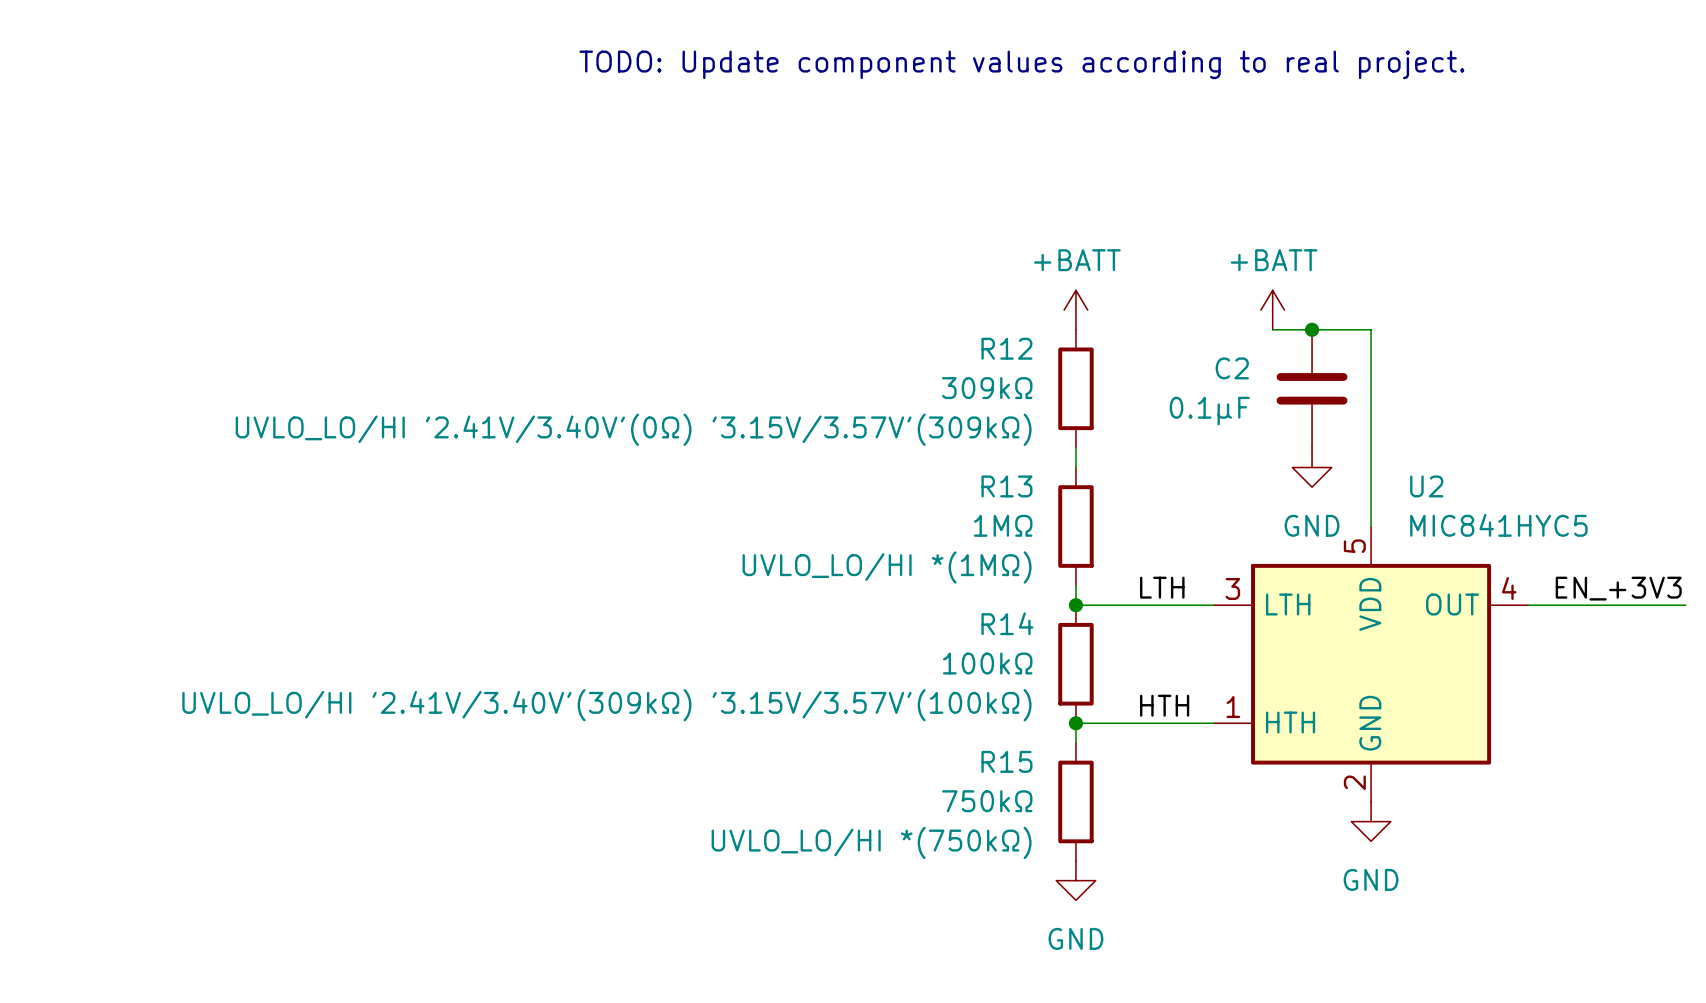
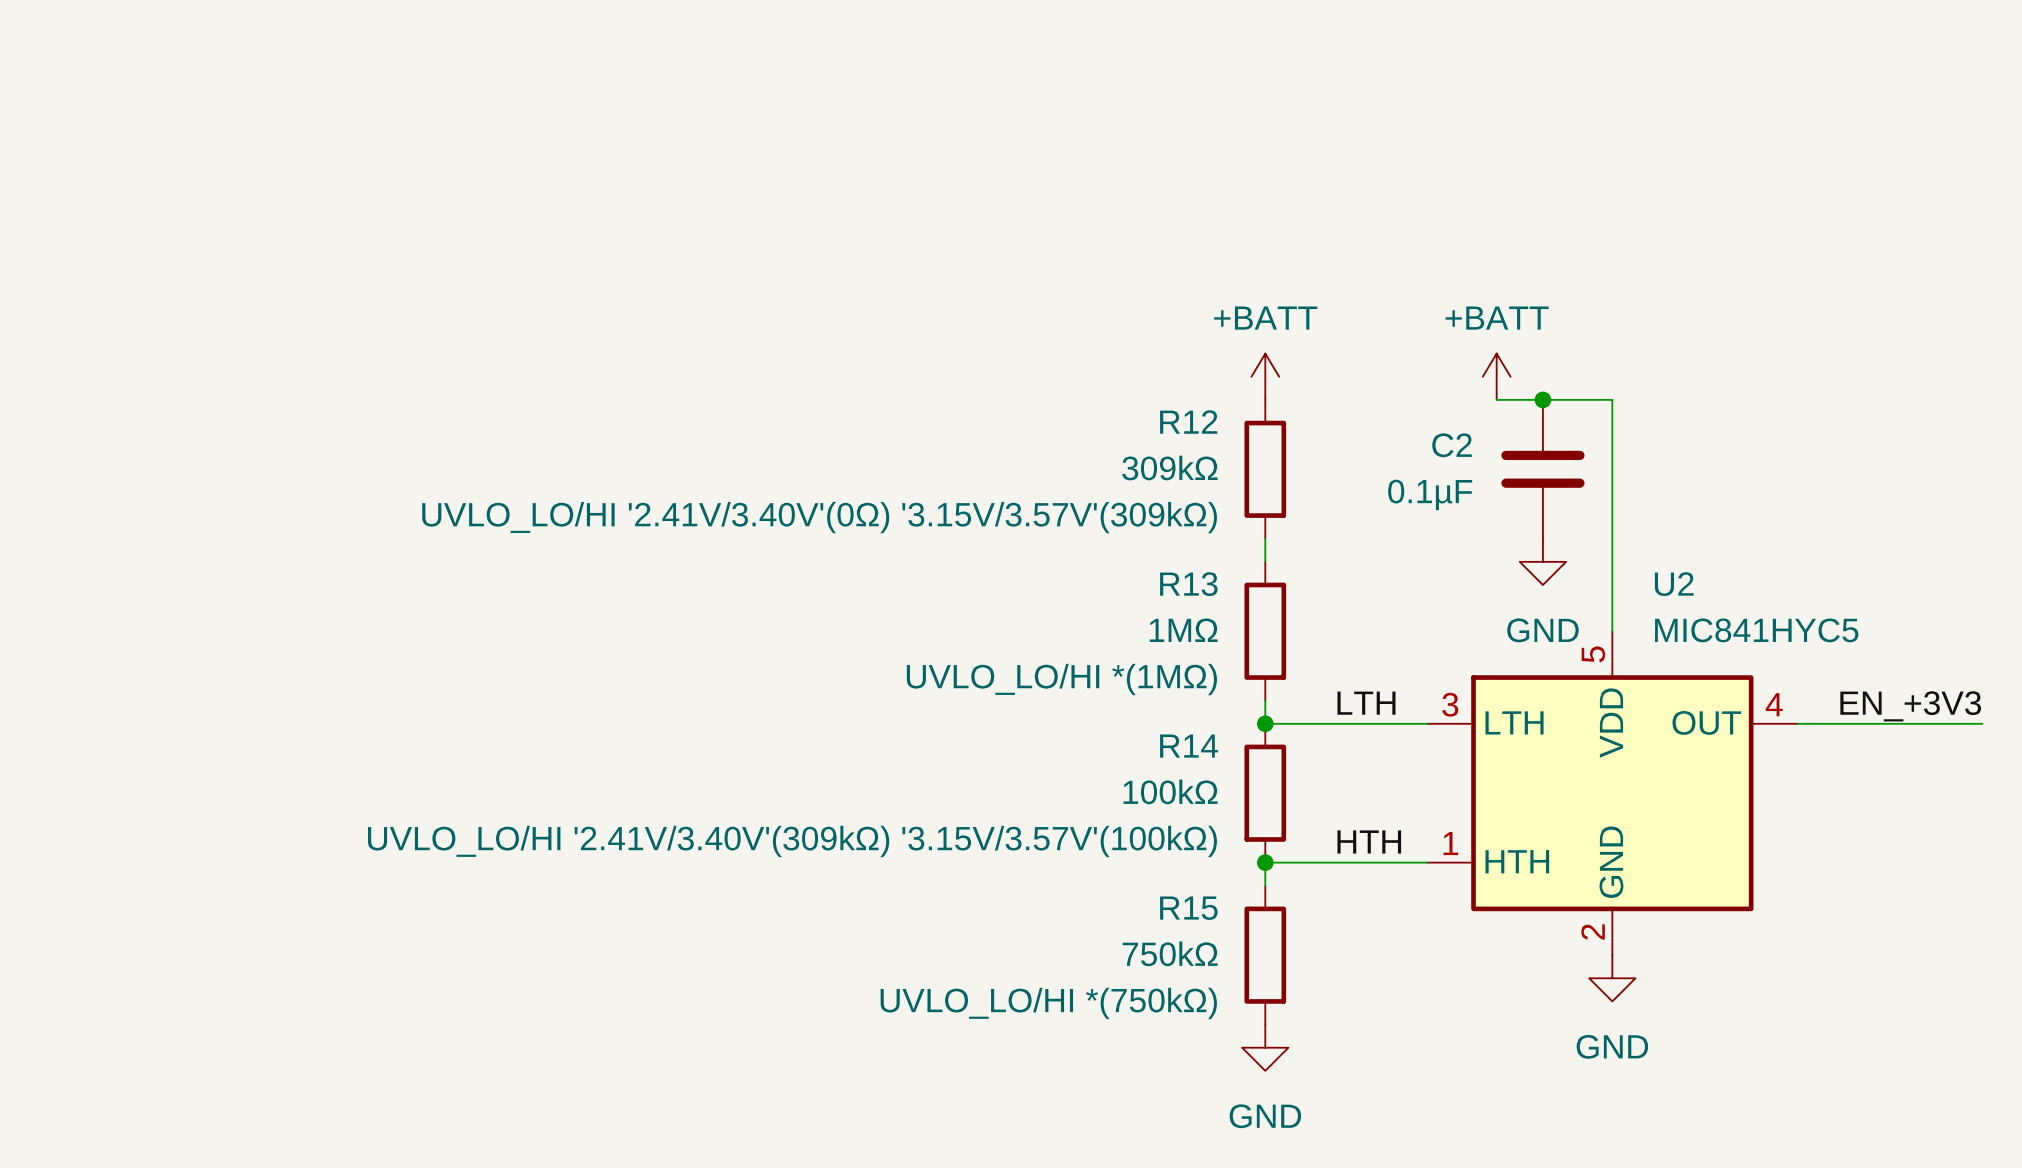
text: TODO: Update component values according to real project. (1021, 64) -> none

